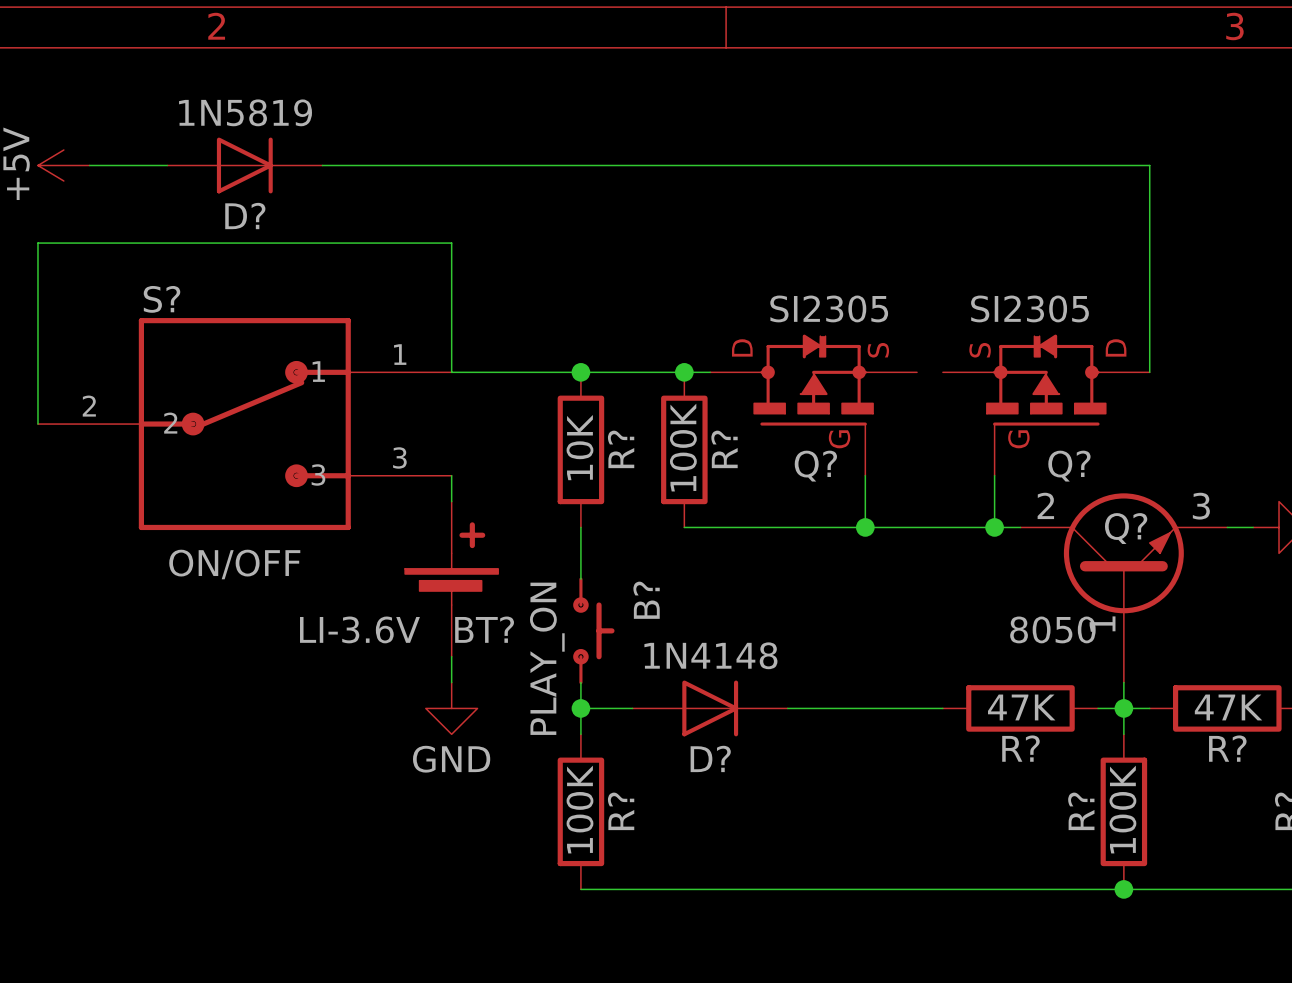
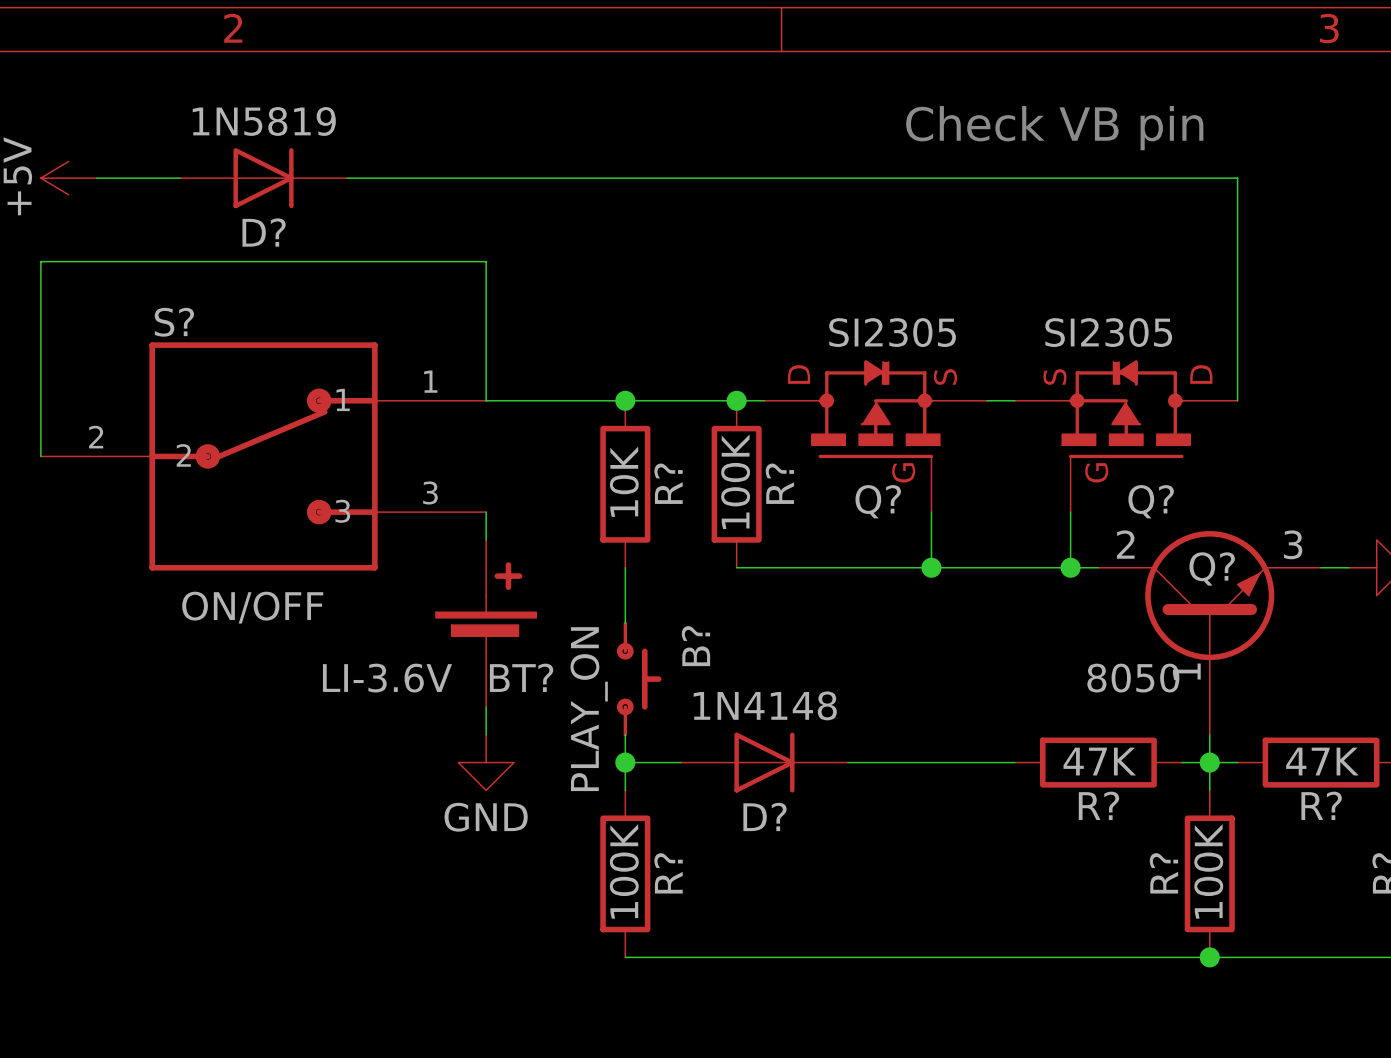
text: none -> Check VB pin (1054, 128)
wire: none -> (987, 400) (1014, 400)

